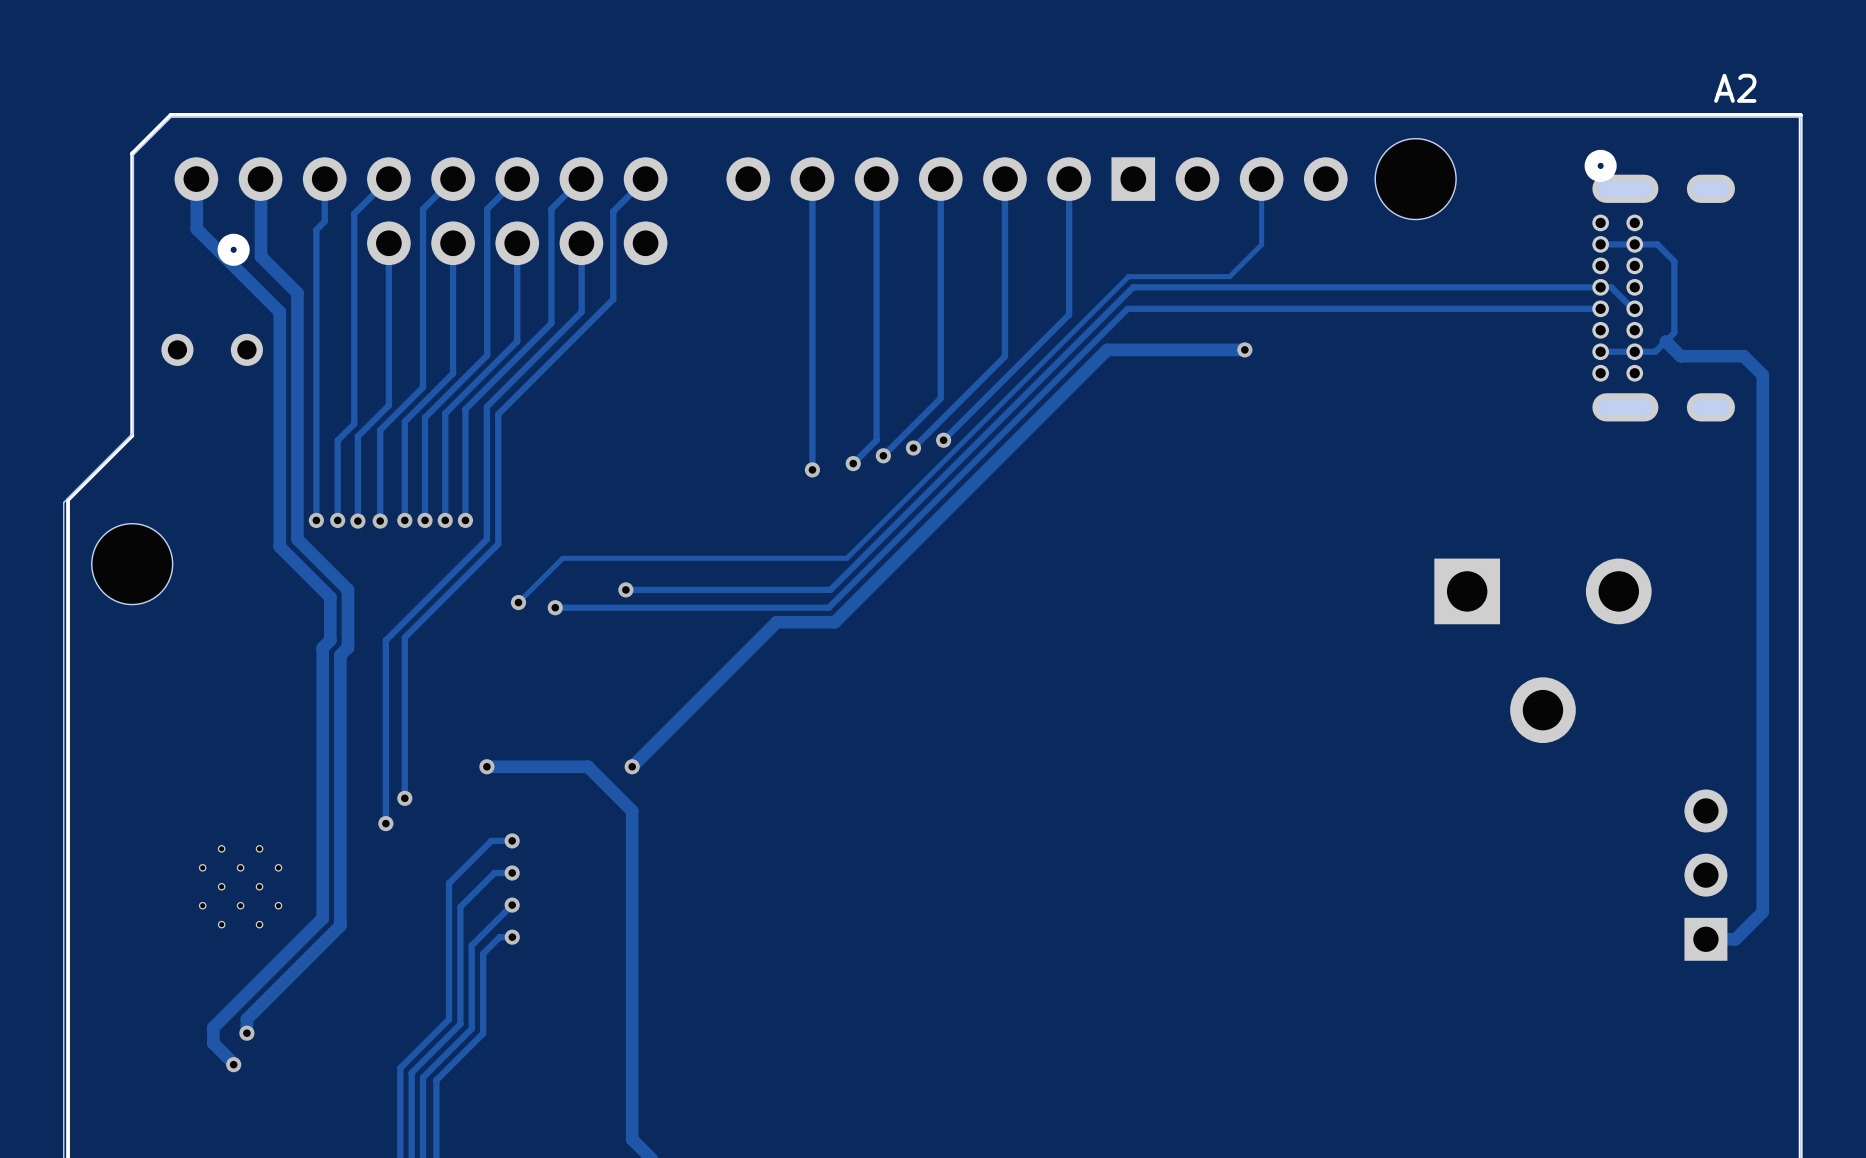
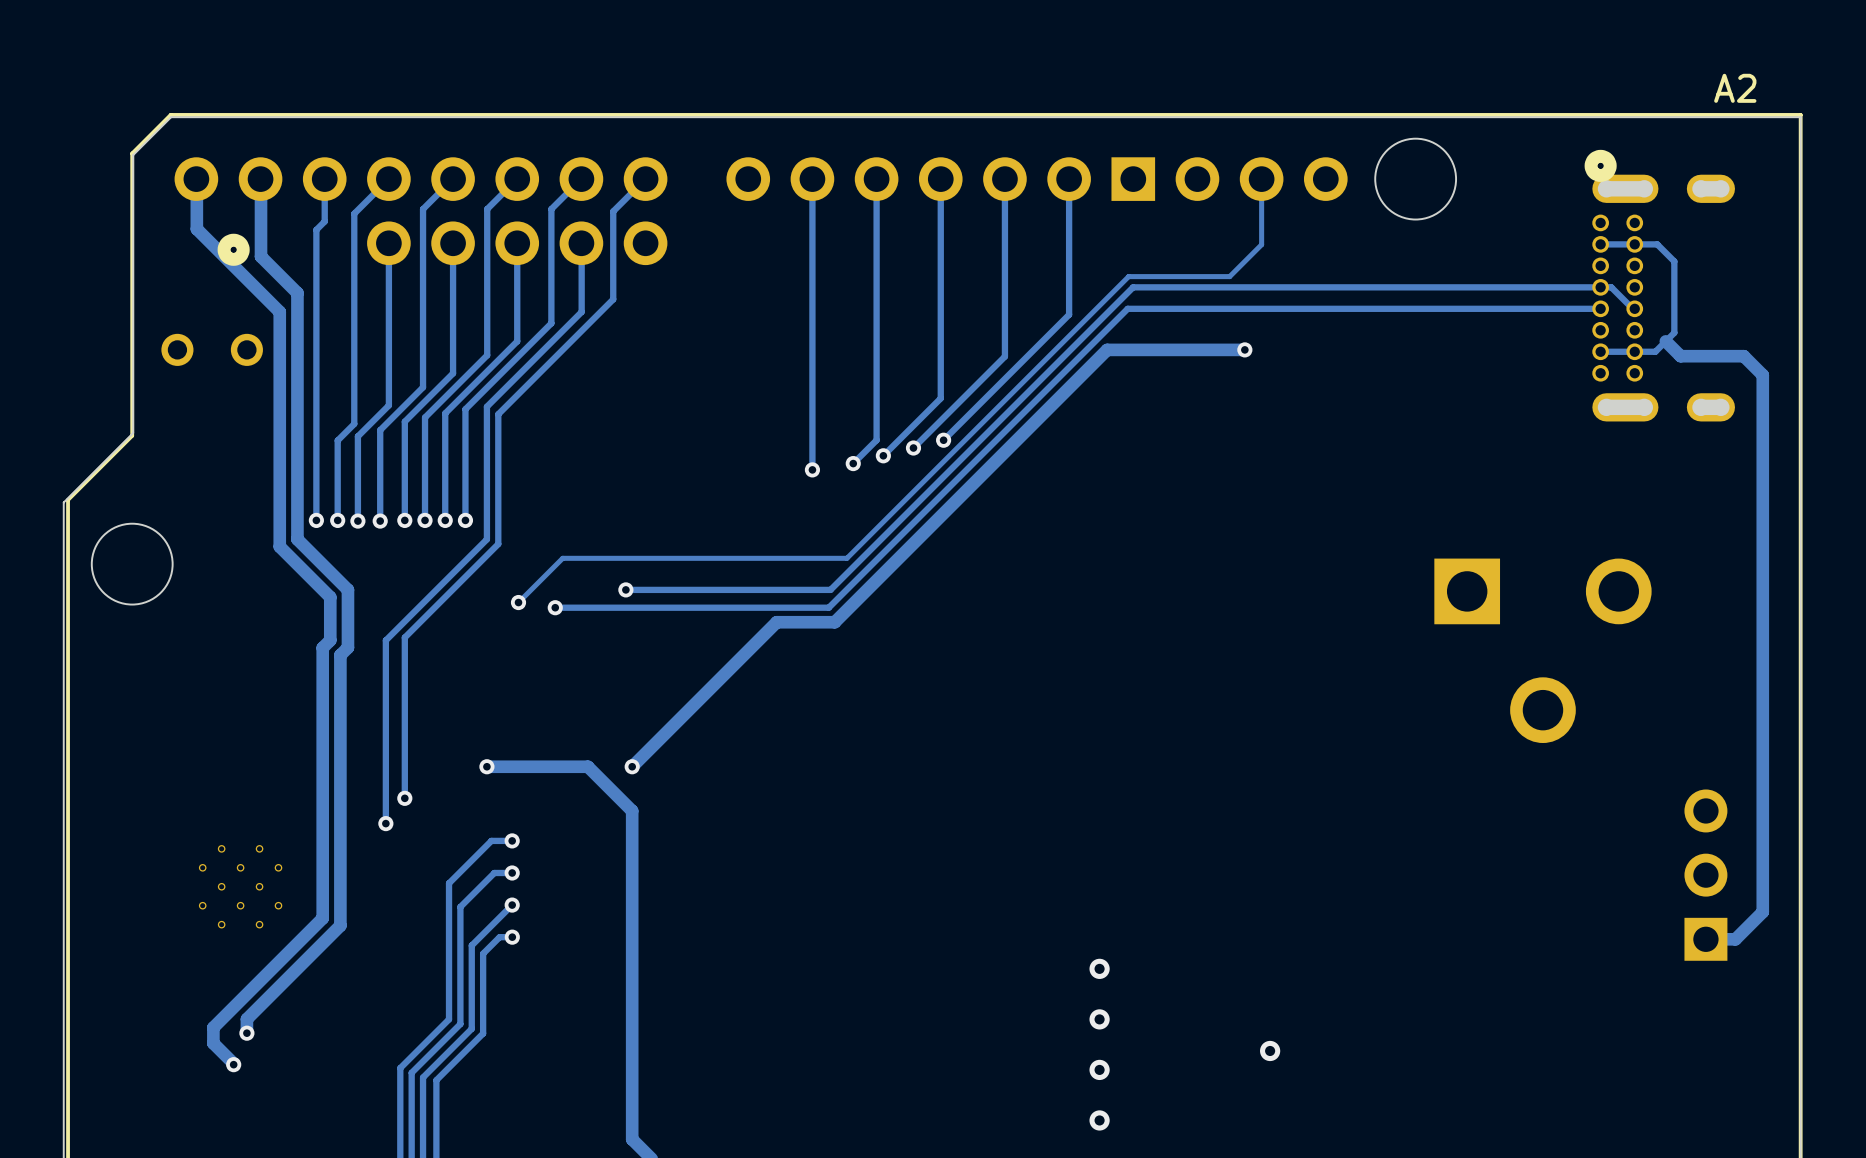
via: none -> (1099, 968)
via: none -> (1099, 1019)
via: none -> (1270, 1050)
via: none -> (1099, 1069)
via: none -> (1099, 1120)

